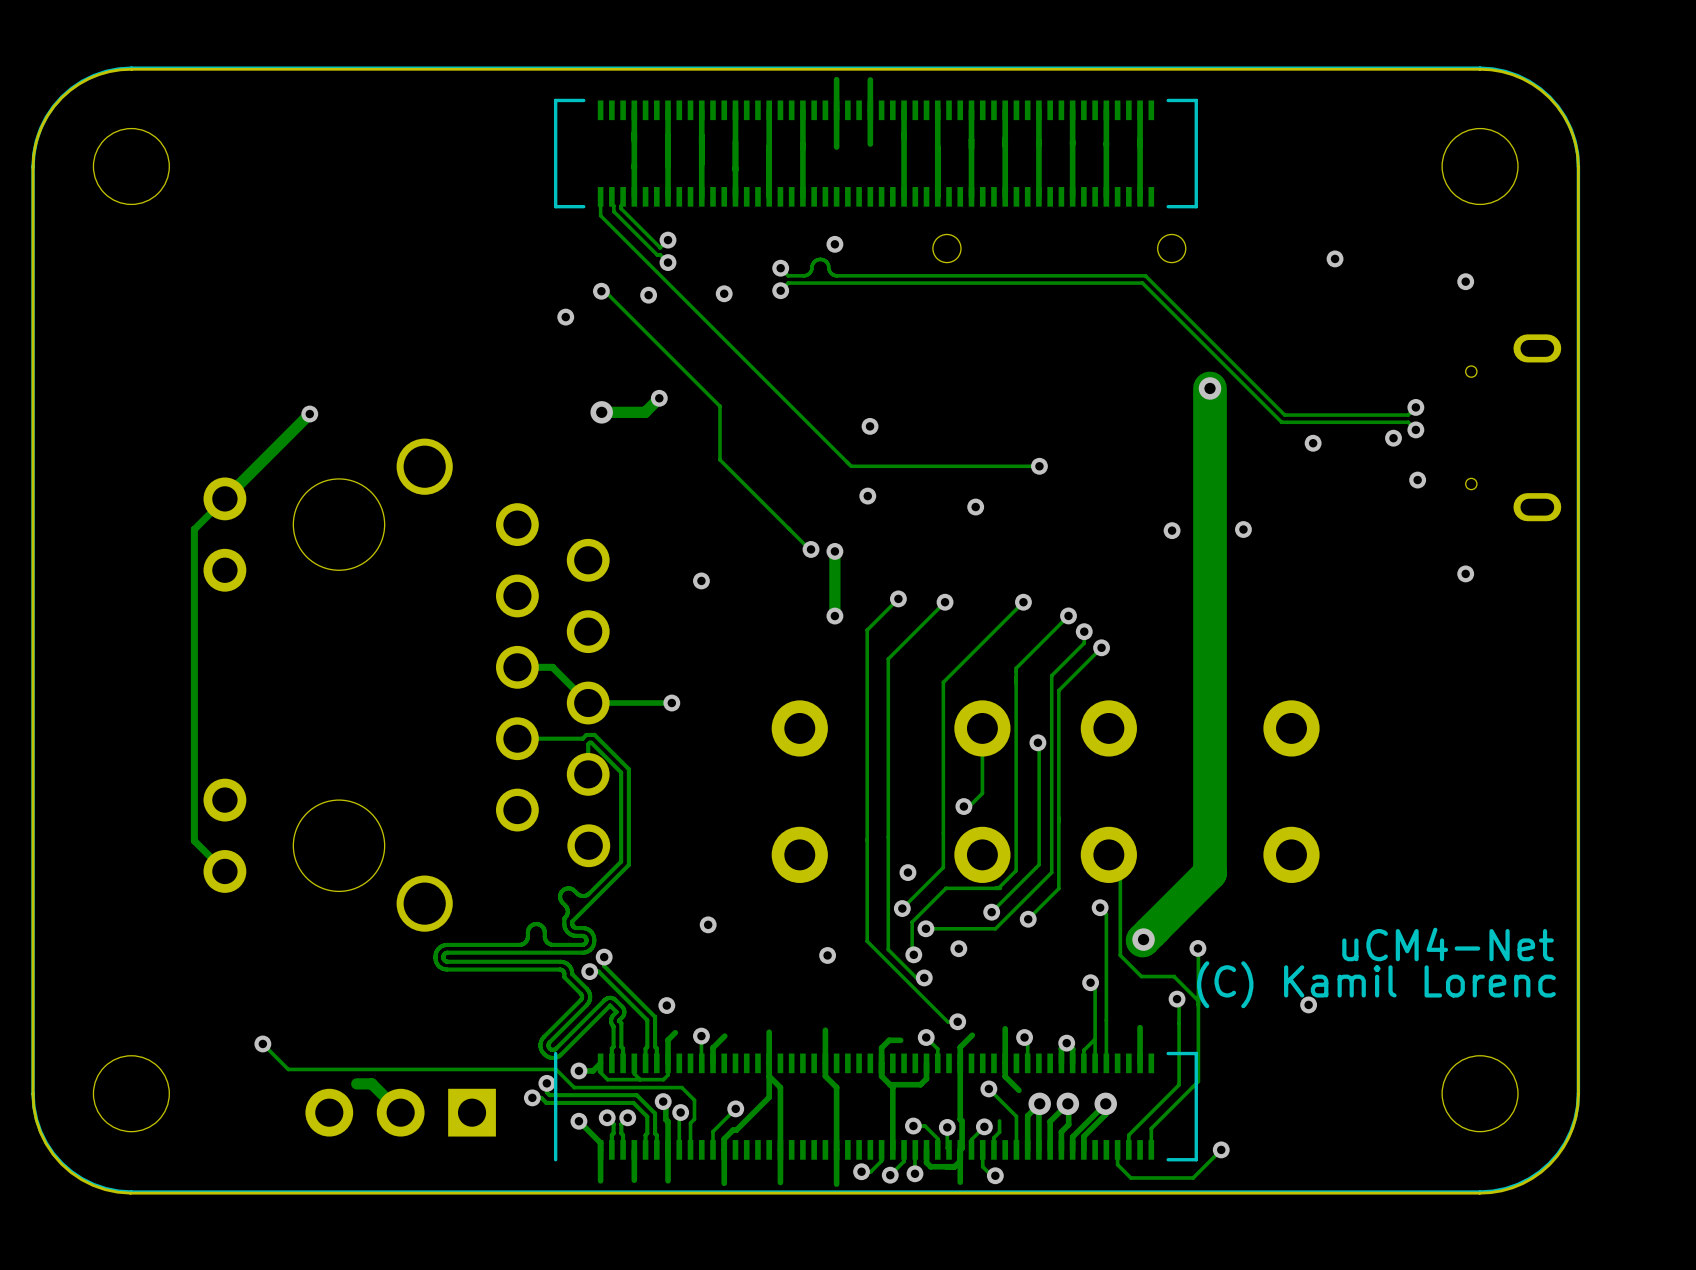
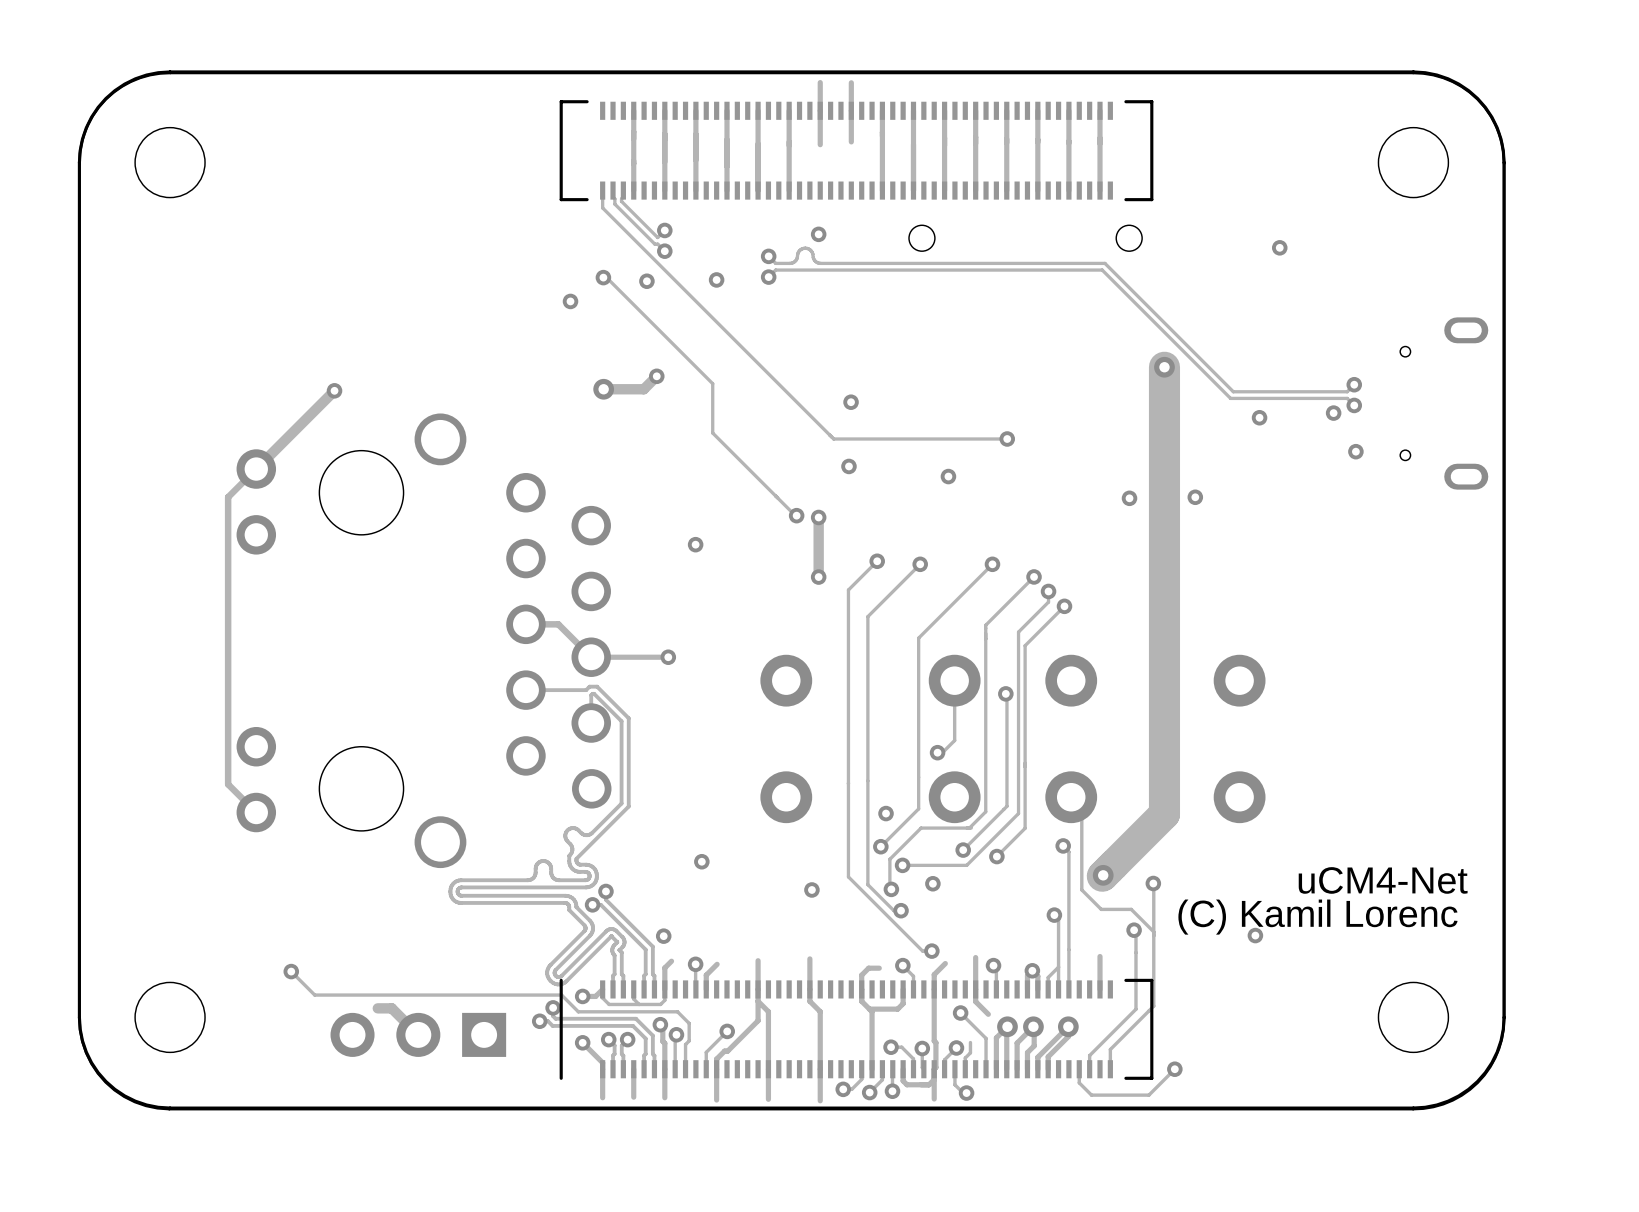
via: (1465, 281) -> none
via: (1465, 573) -> none

